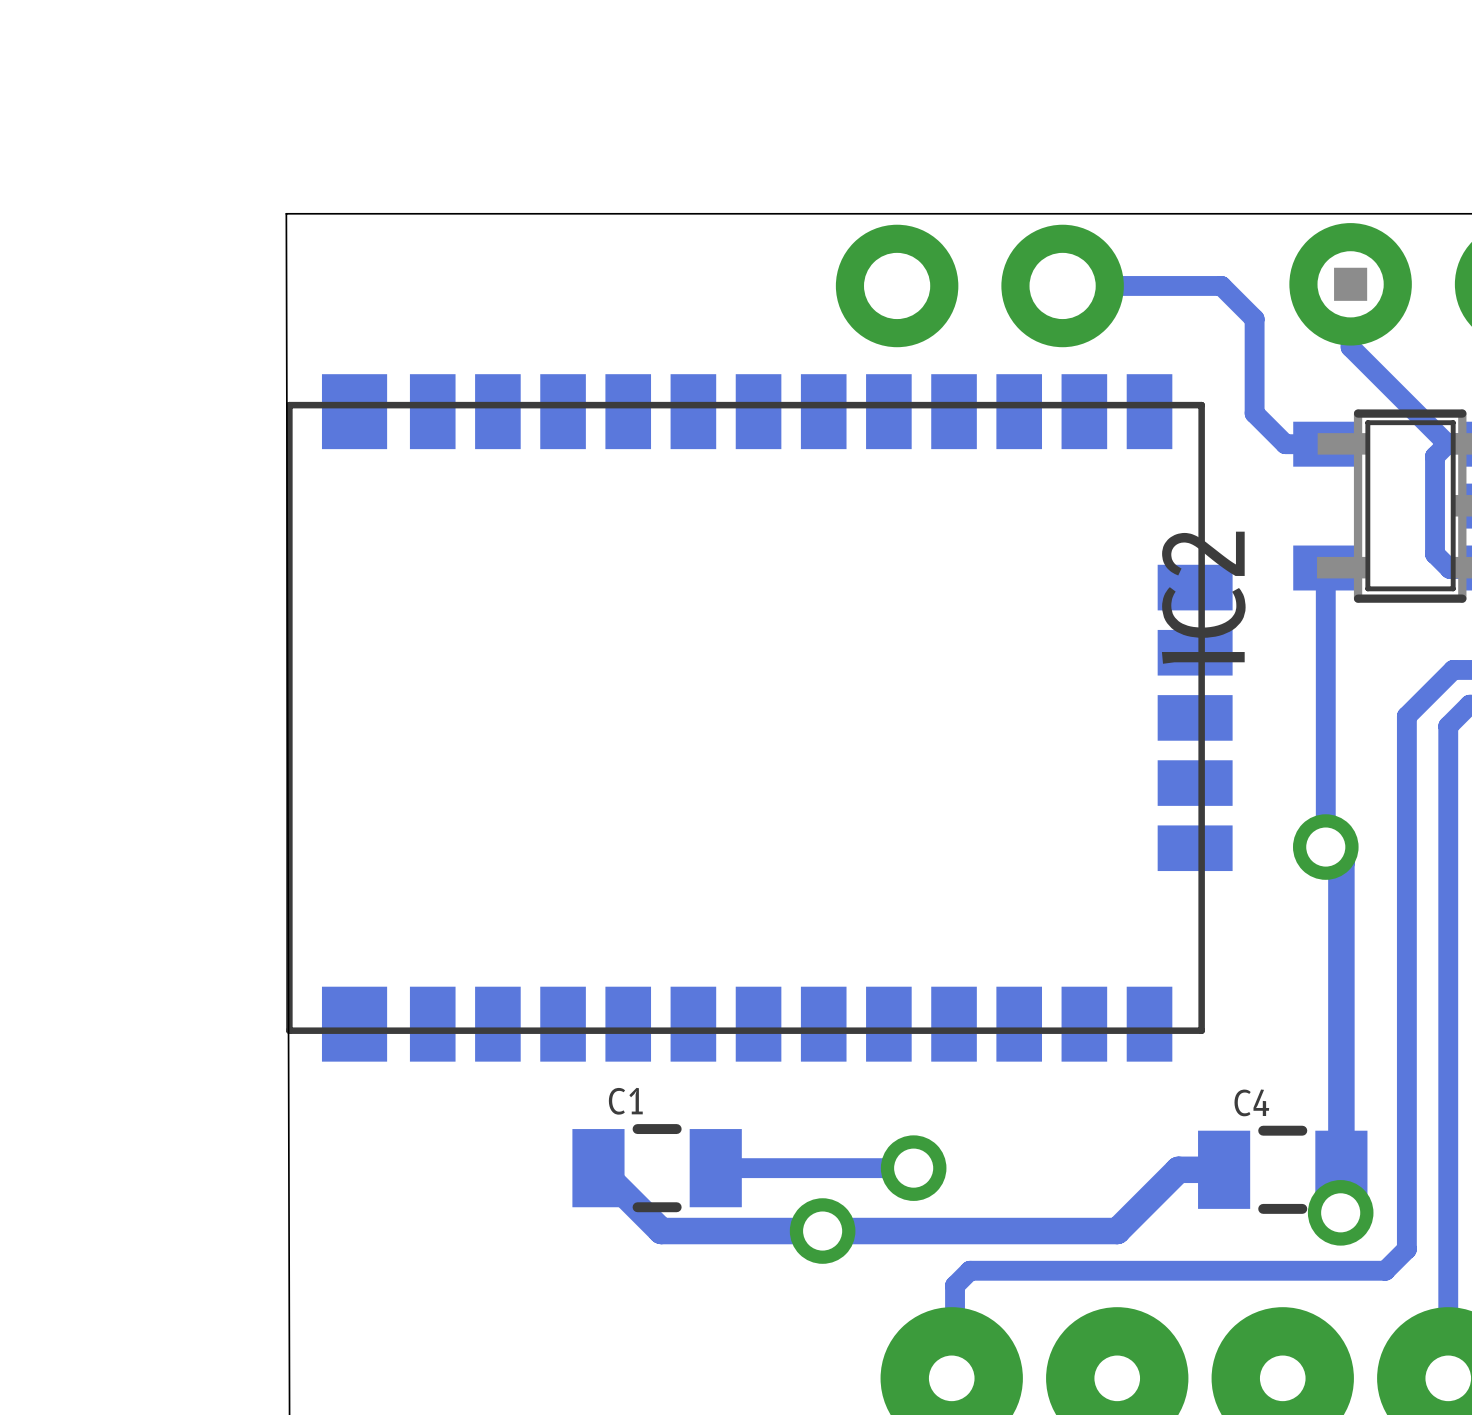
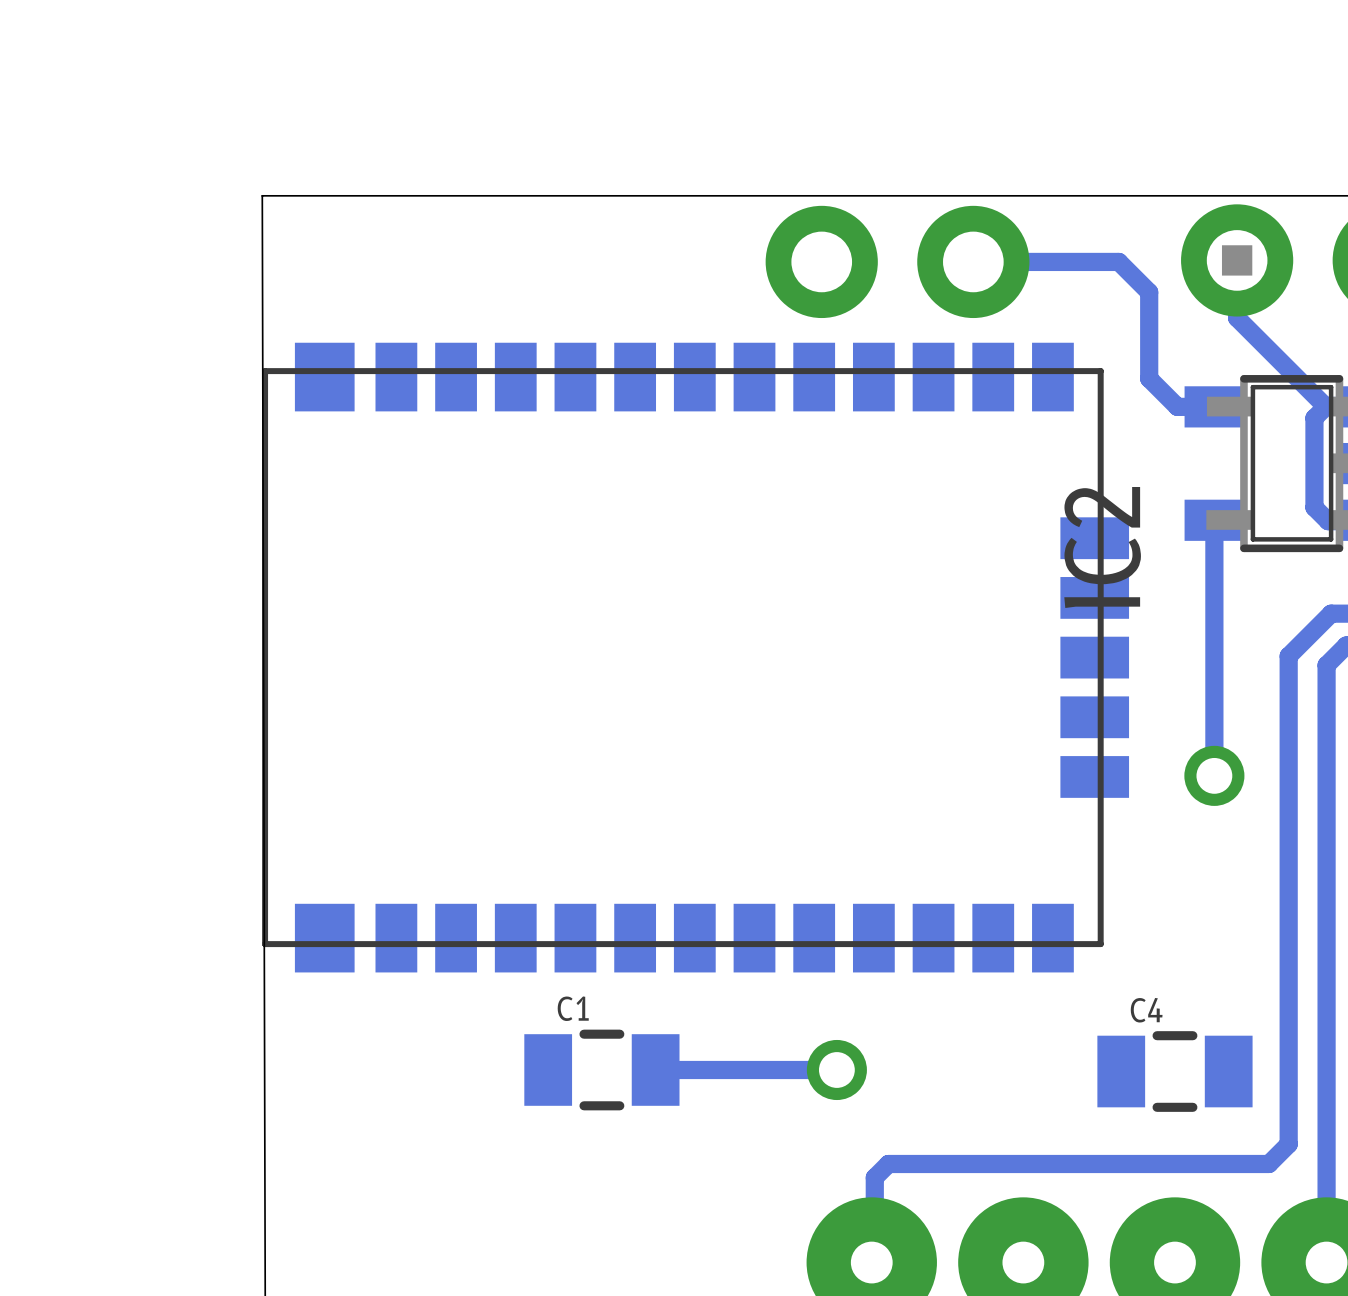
track: (1325, 847) (1341, 862) (1341, 1169) -> none
track: (598, 1168) (661, 1231) (1117, 1231) (1178, 1169) (1224, 1169) -> none
via: (1340, 1212) -> none
via: (822, 1231) -> none

